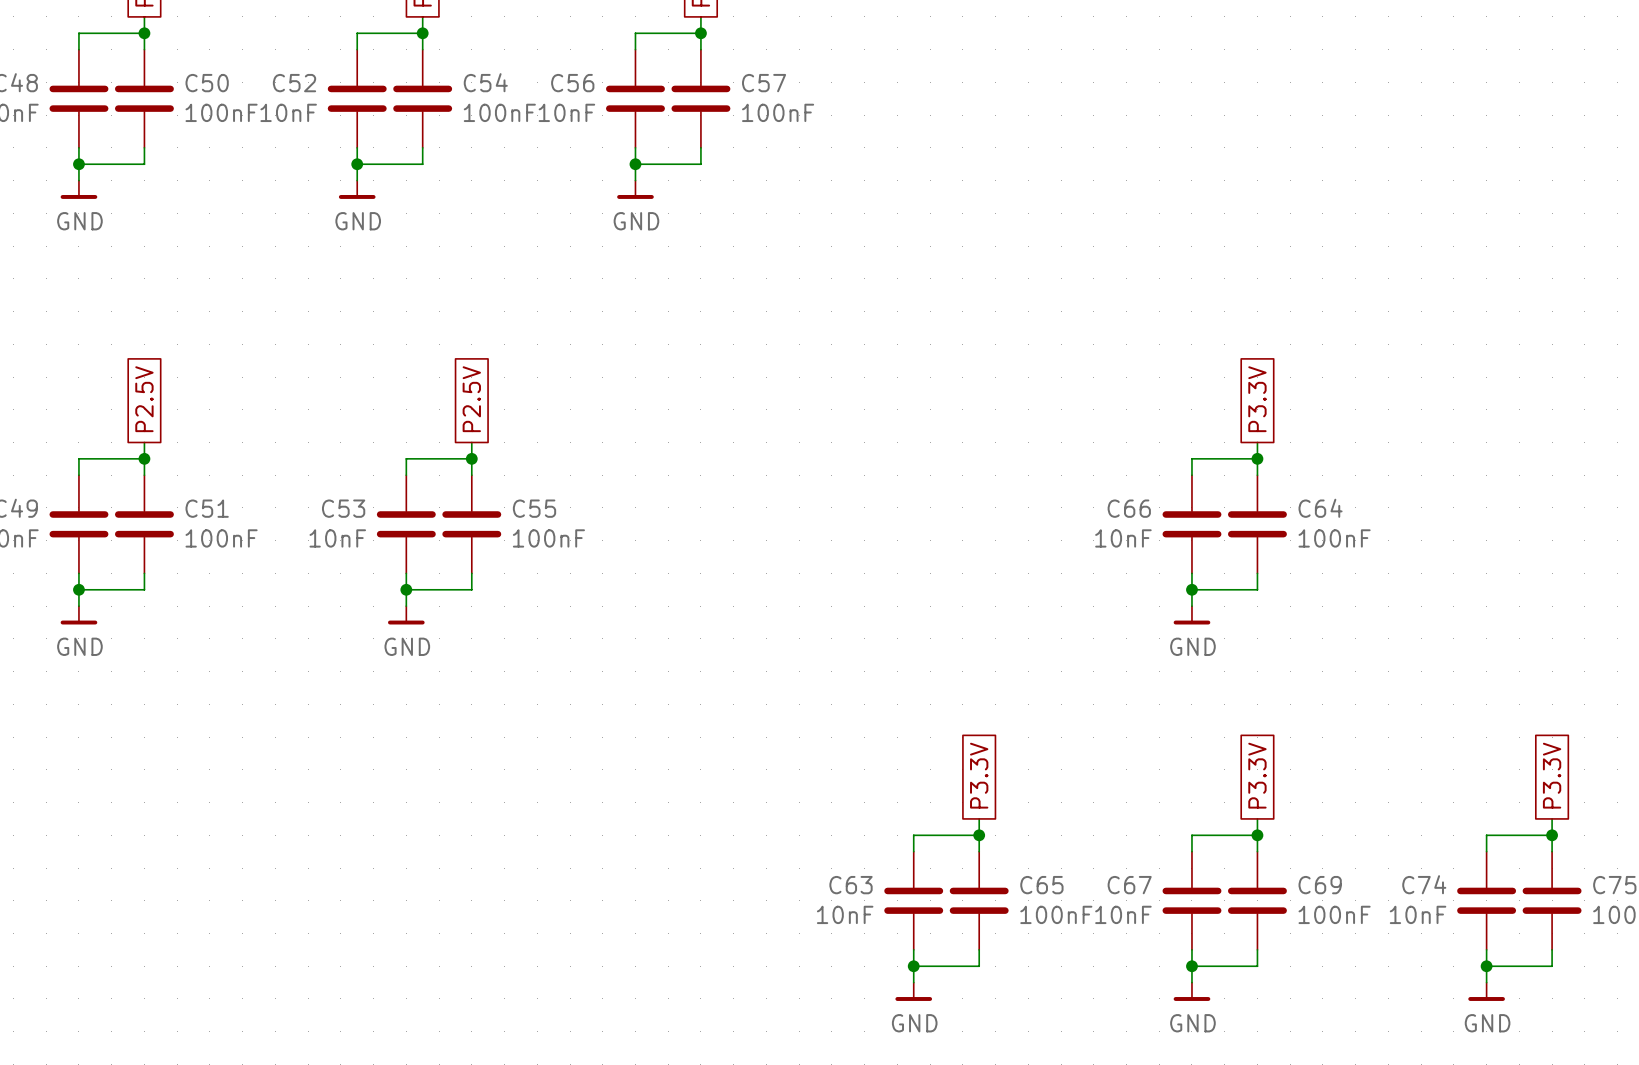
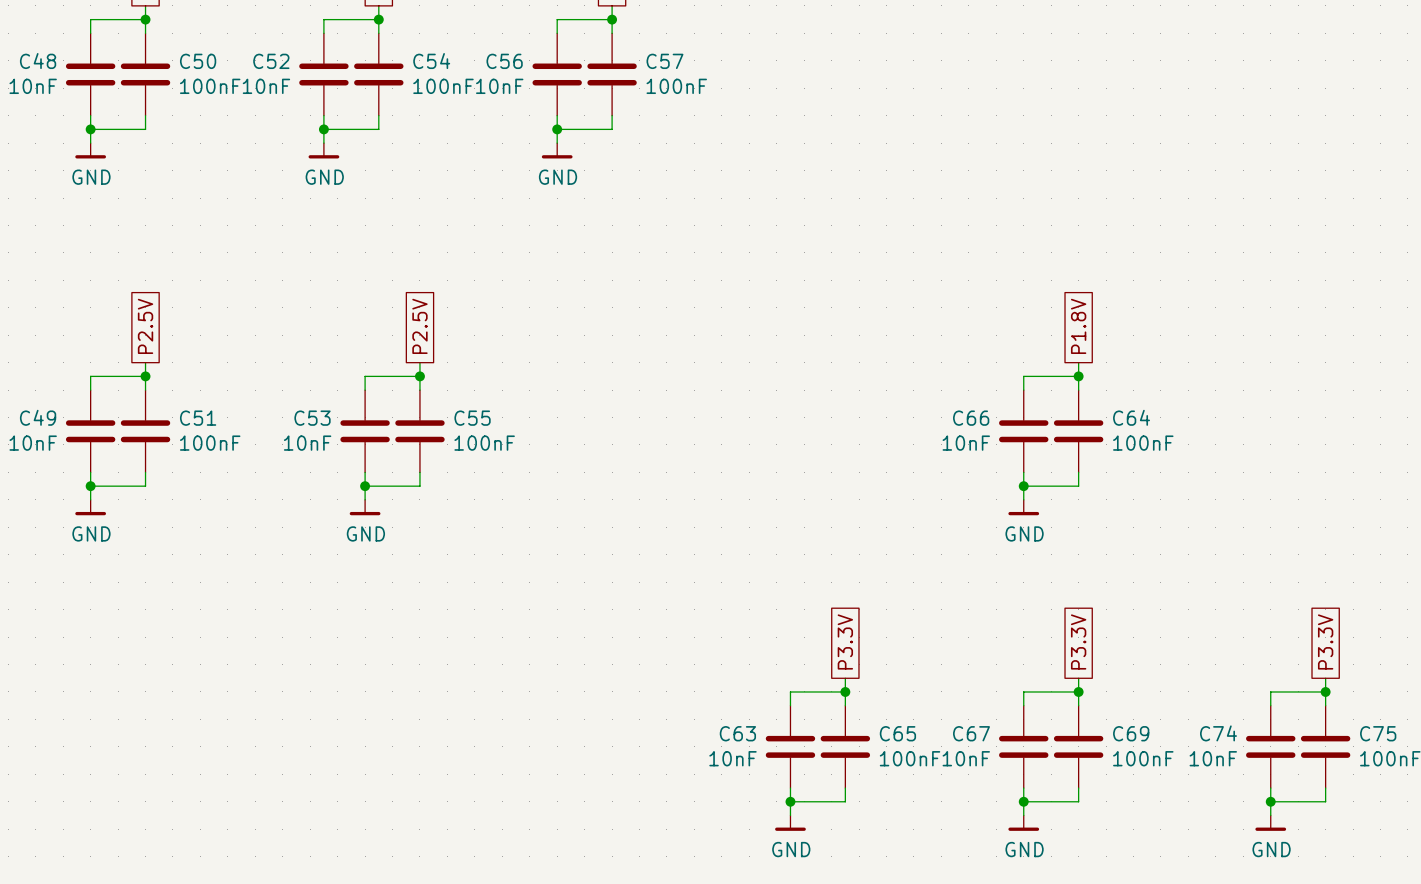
global label: P3.3V (1257, 399) -> P1.8V (1078, 326)

